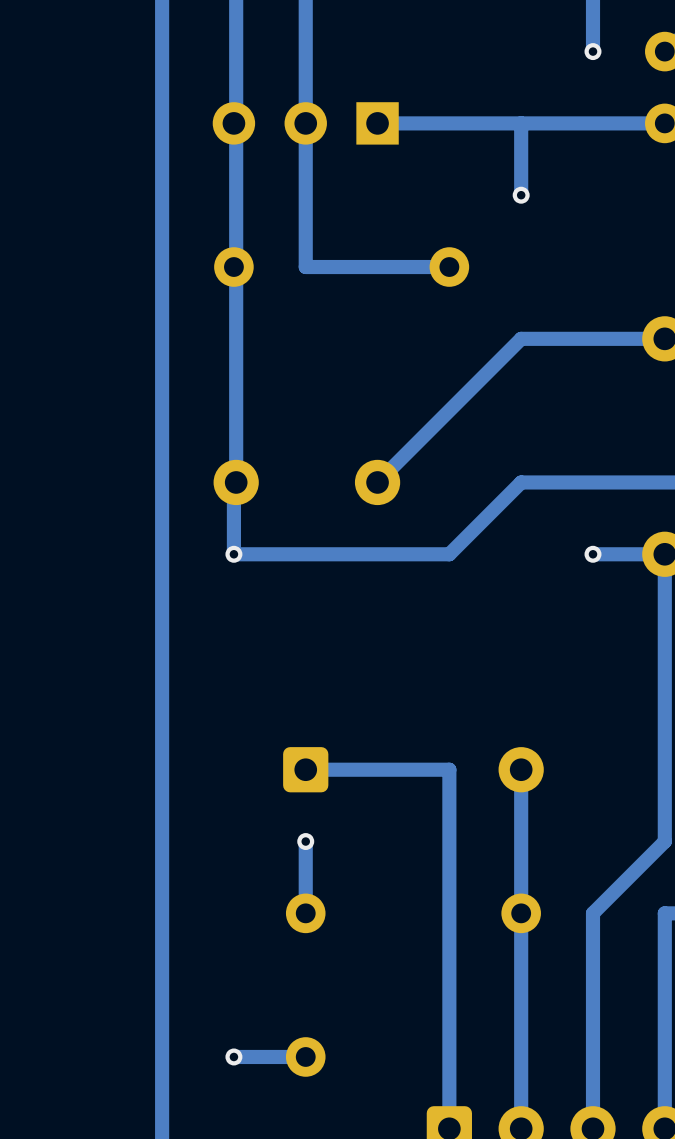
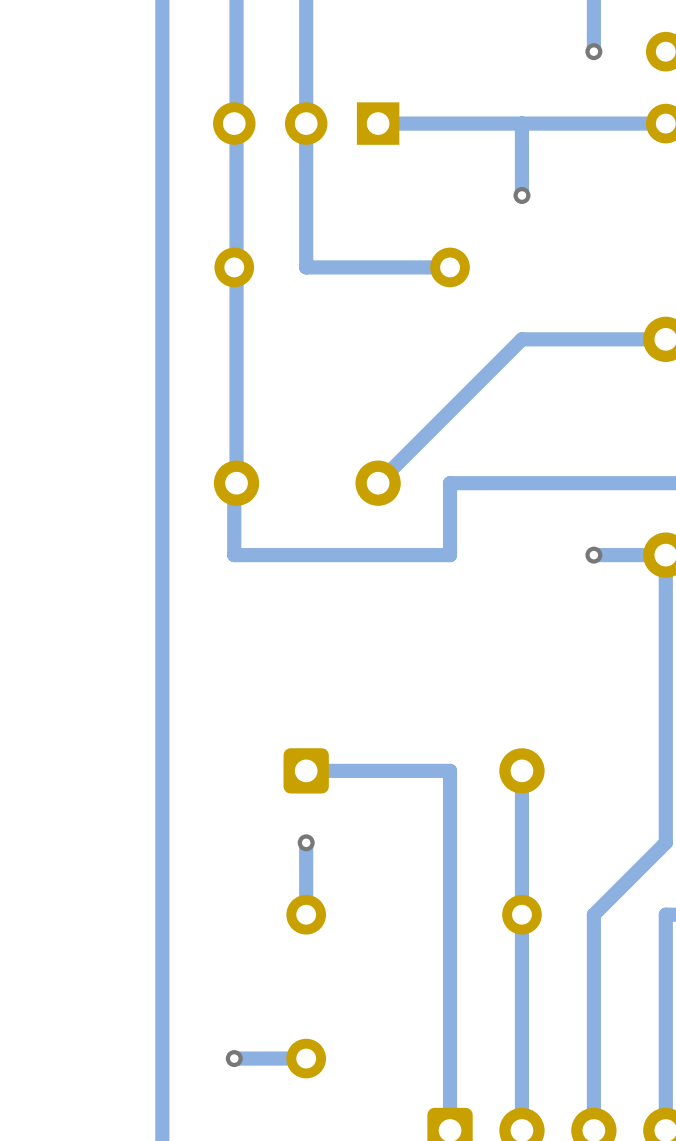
track: (521, 482) (449, 554) -> (521, 483) (450, 483) (450, 555)
via: (233, 554) -> none

